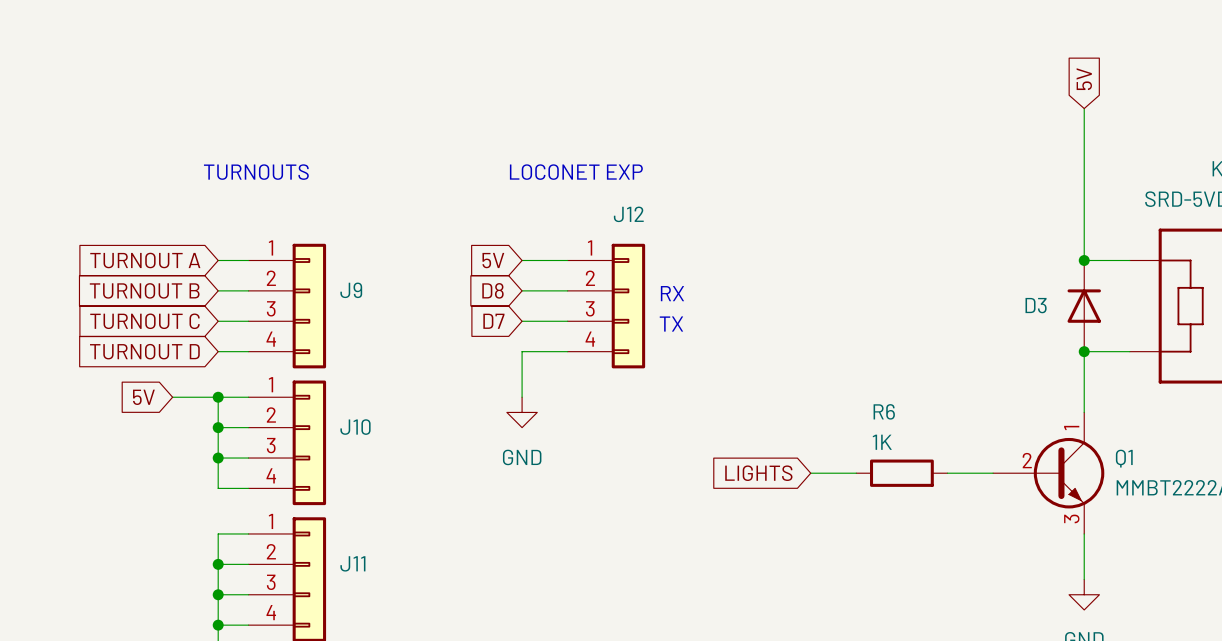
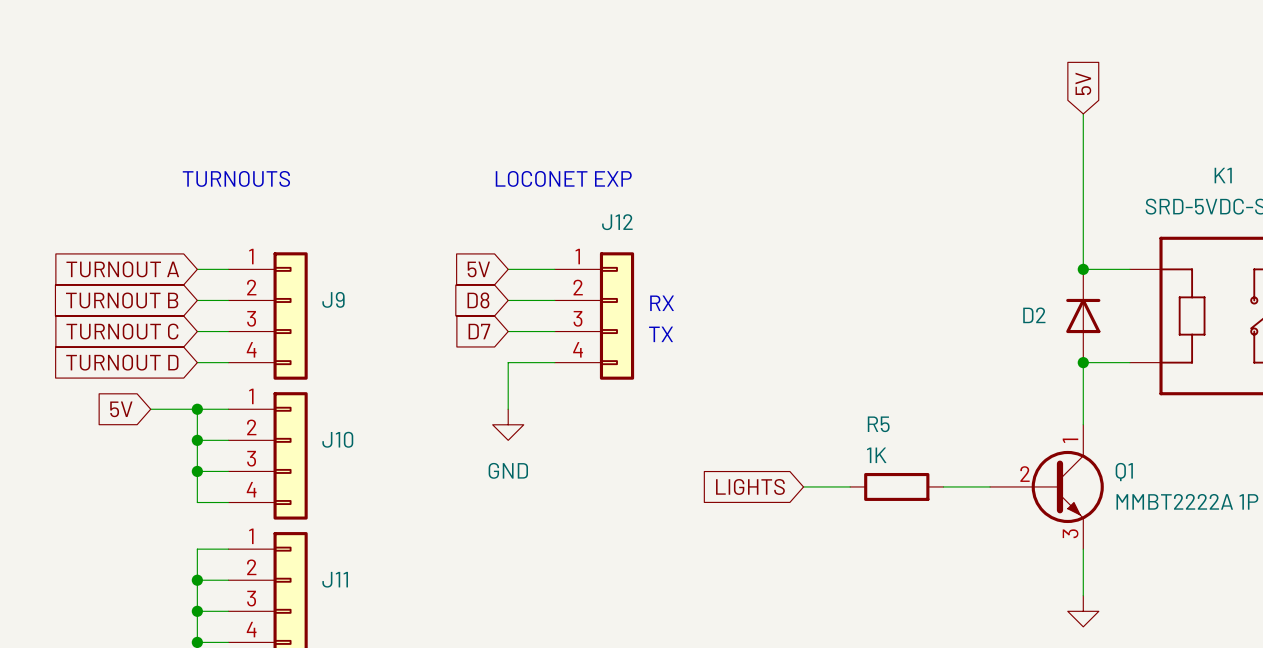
D3 name: D3 (1036, 305) -> D2 (1034, 315)
R6 name: R6 (884, 411) -> R5 (878, 424)

